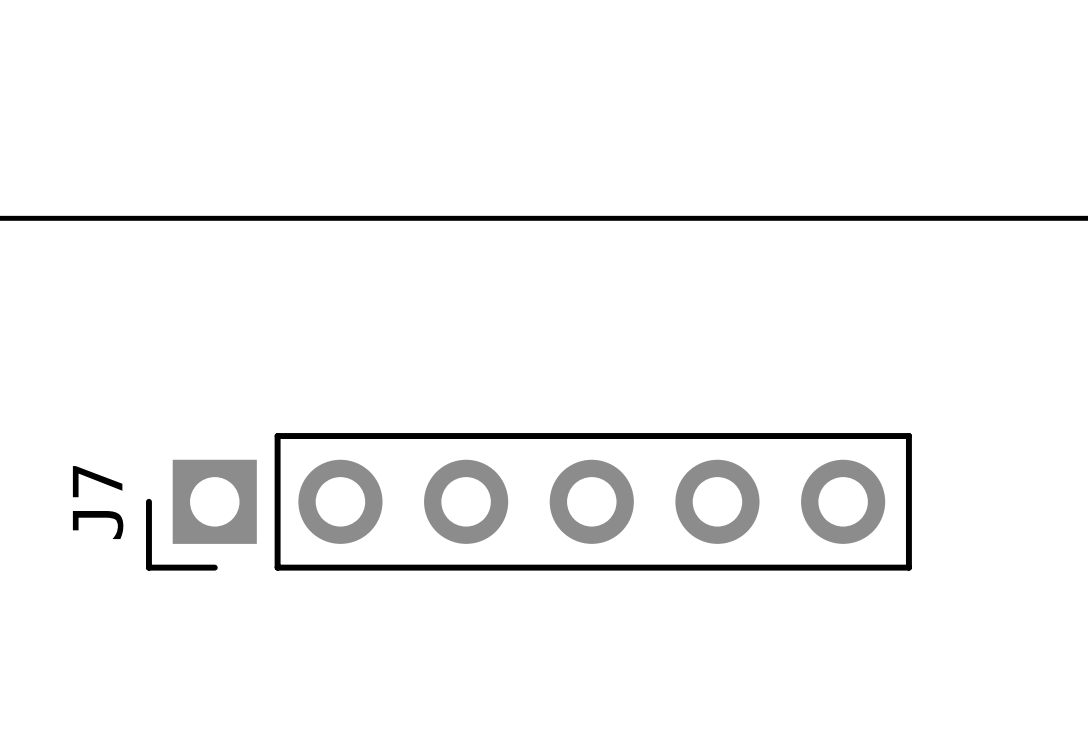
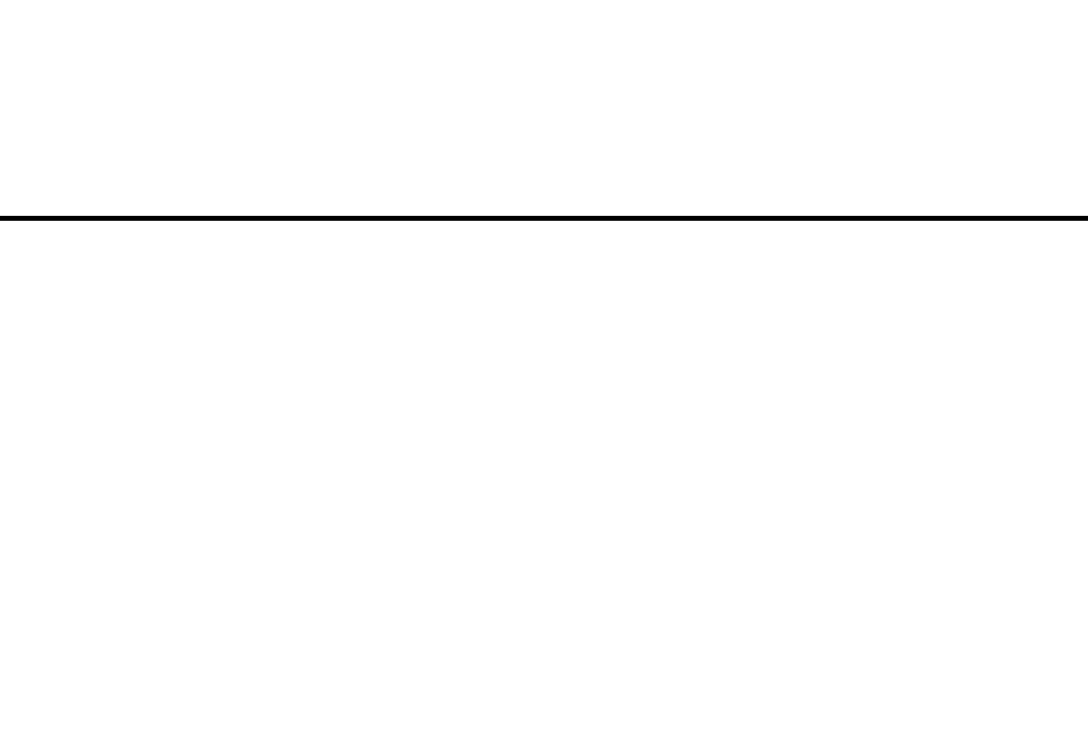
J7: (528, 501) -> none

